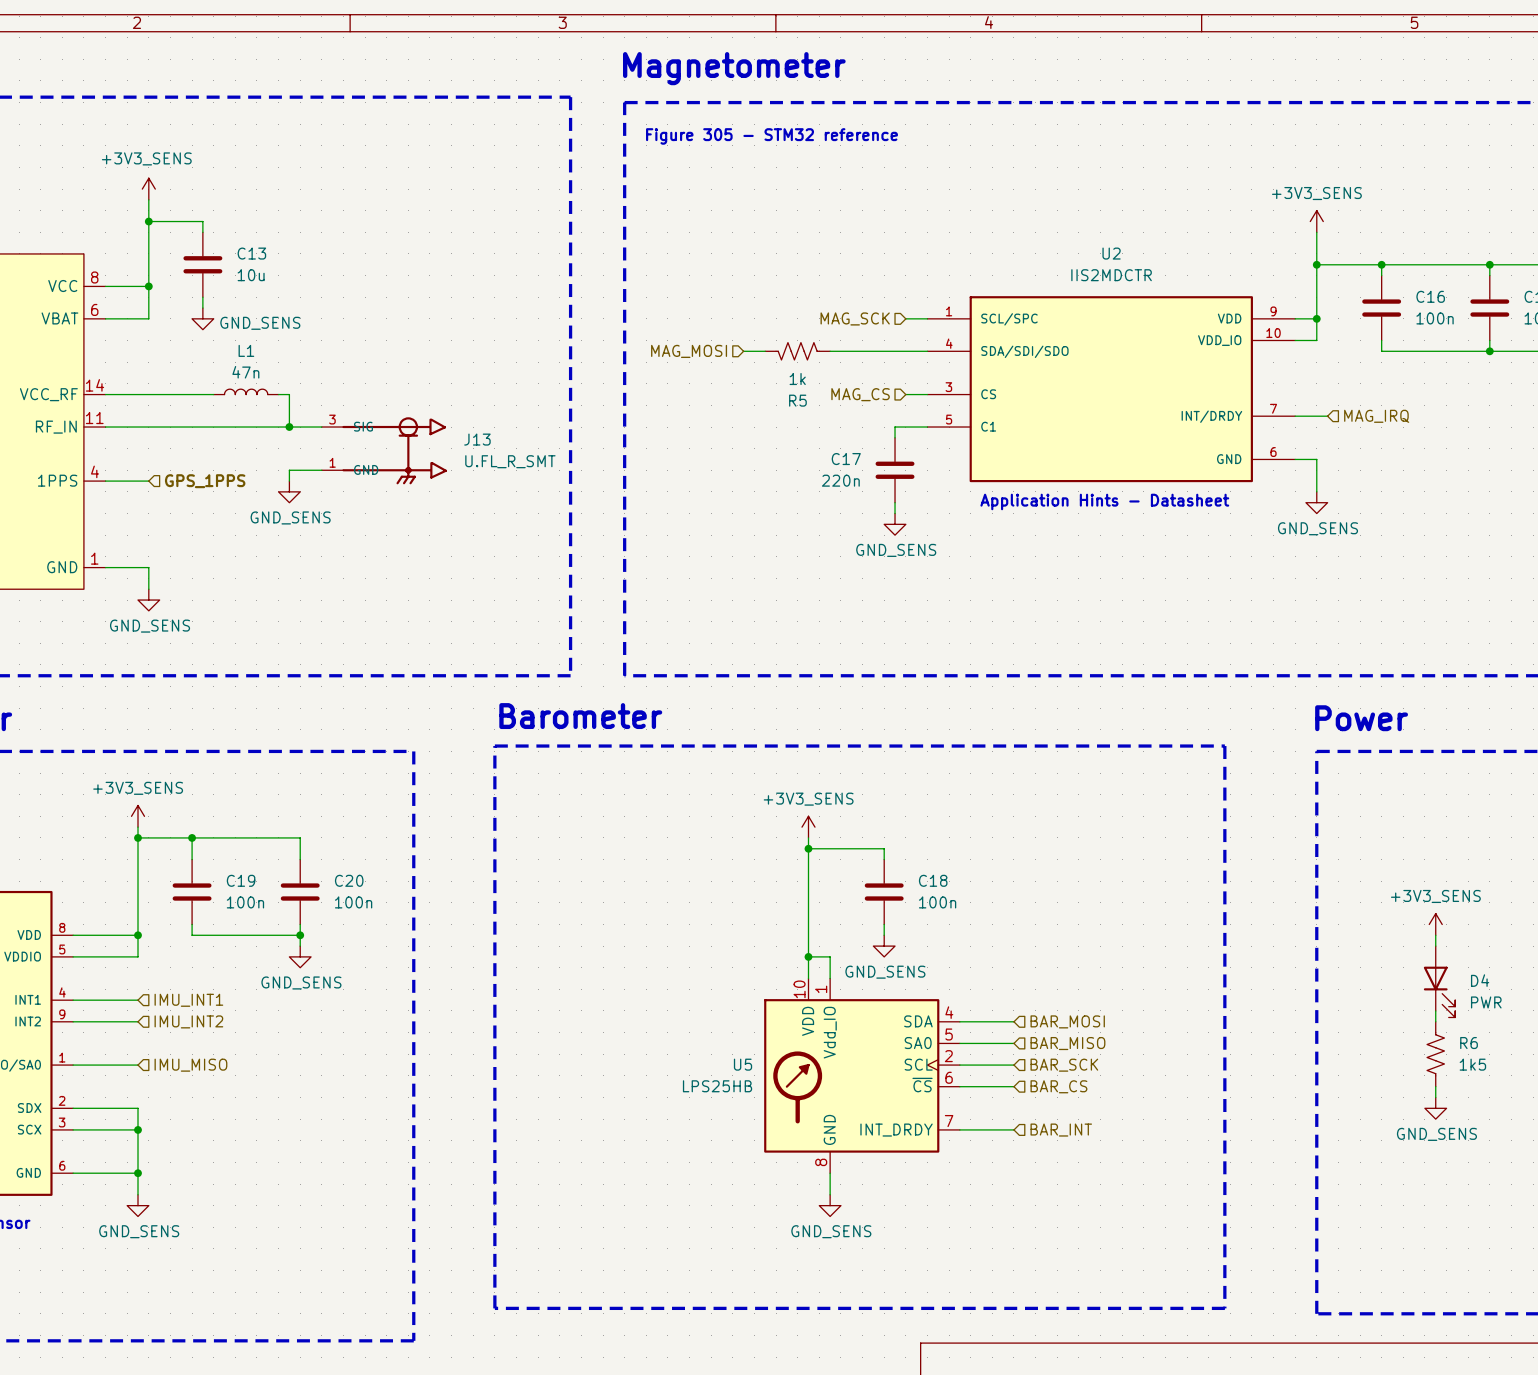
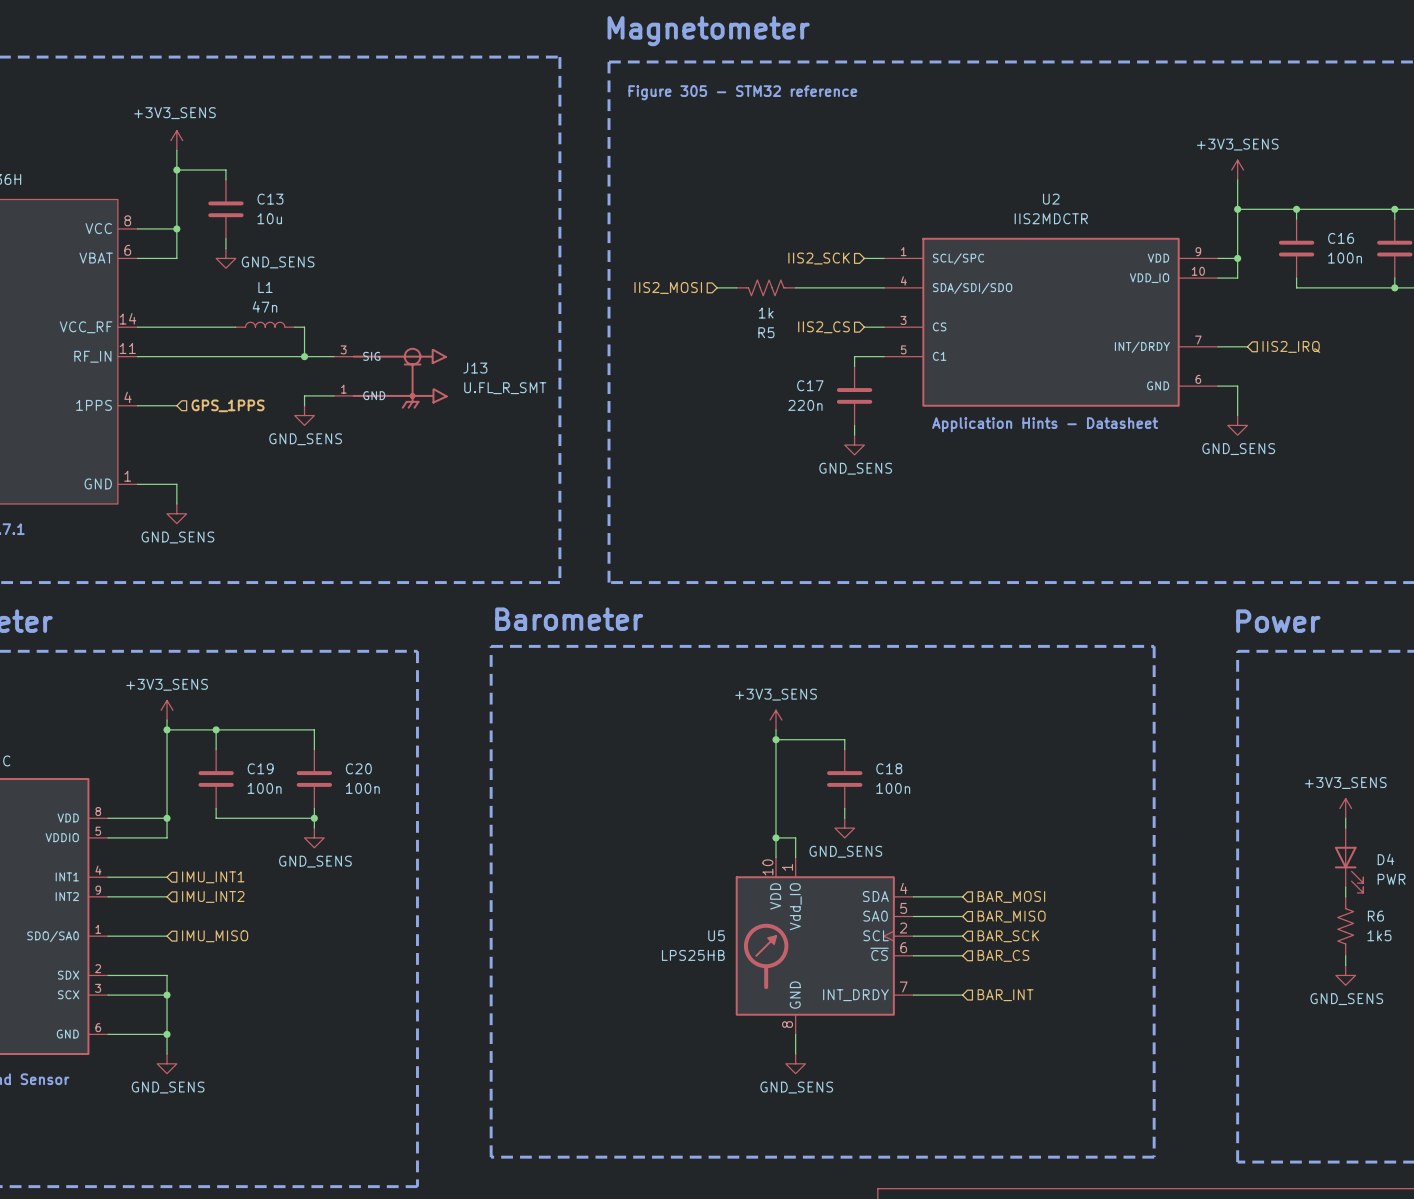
hierarchical label: MAG_SCK (855, 318) -> IIS2_SCK (819, 258)
hierarchical label: MAG_MOSI (689, 351) -> IIS2_MOSI (668, 287)
hierarchical label: MAG_CS (860, 394) -> IIS2_CS (823, 327)
hierarchical label: MAG_IRQ (1376, 416) -> IIS2_IRQ (1291, 346)

